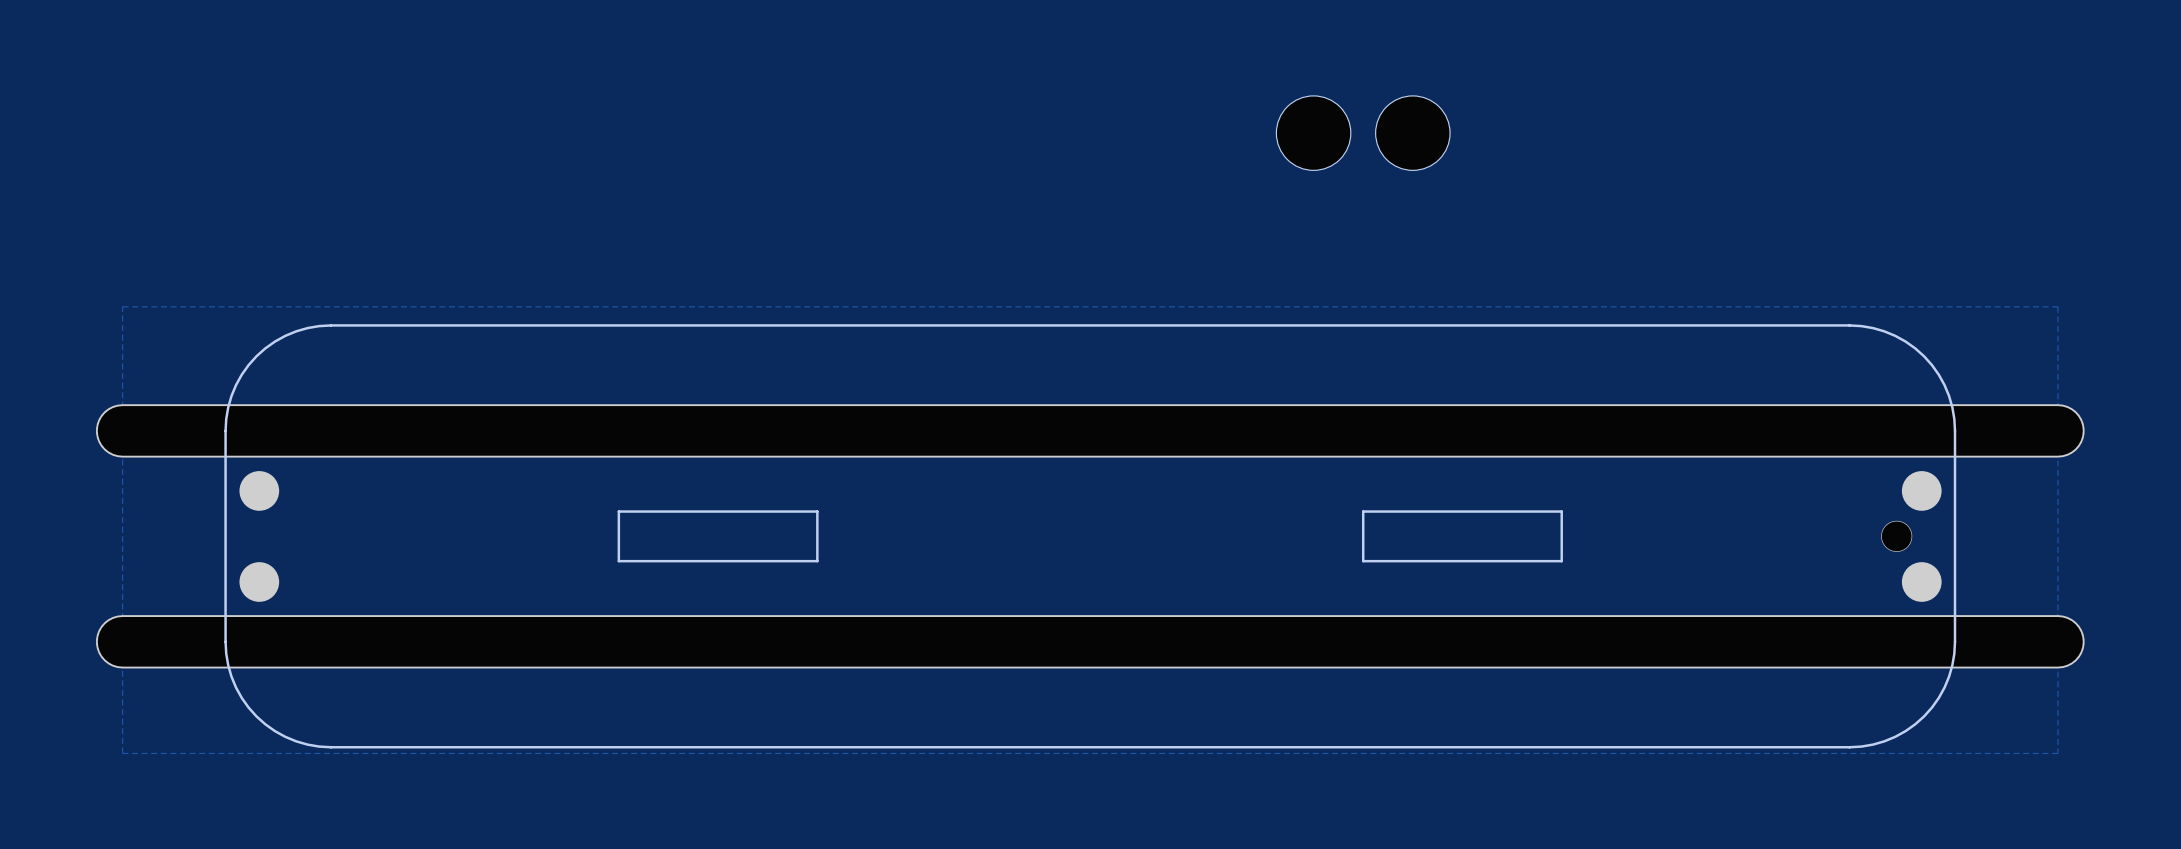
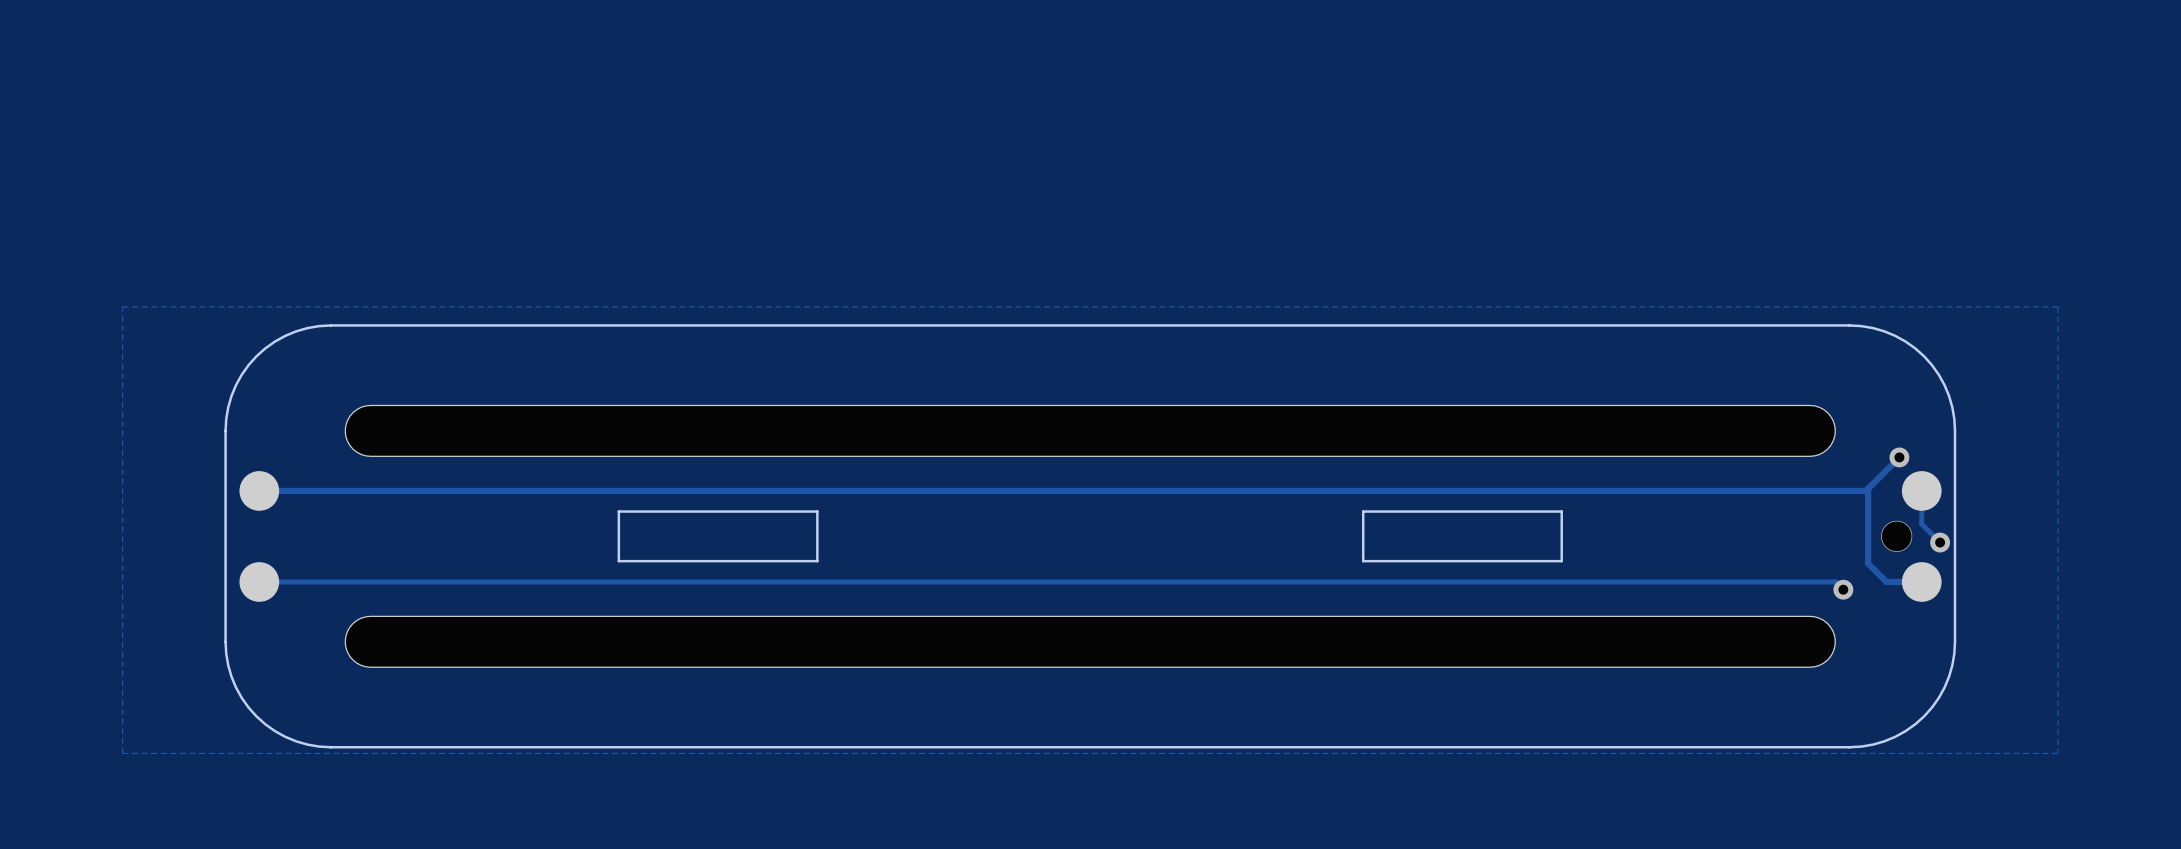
part: (1313, 133) -> none
part: (1412, 133) -> none
part footprint: [95, 404, 2085, 458] -> [344, 404, 1836, 457]
track: none -> (1899, 457) (1865, 490) (259, 490)
via: none -> (1899, 457)
track: none -> (1868, 488) (1868, 563) (1886, 582) (1921, 582)
track: none -> (1921, 490) (1921, 524) (1940, 542)
via: none -> (1940, 542)
track: none -> (259, 582) (1835, 582) (1843, 589)
via: none -> (1843, 589)
part footprint: [95, 615, 2085, 669] -> [344, 615, 1836, 668]

